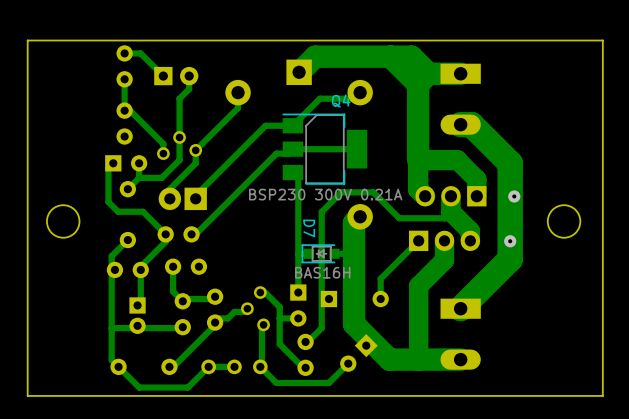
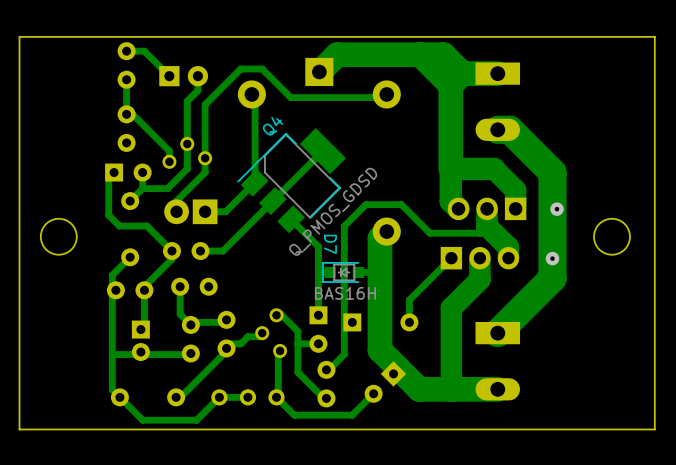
track: (238, 92) (238, 108) (195, 150) -> (251, 94) (255, 97) (255, 182) (225, 211) (205, 211)
track: none -> (386, 94) (383, 97) (290, 97) (262, 69) (240, 69) (205, 104) (205, 158)
track: (354, 98) (319, 98) (292, 125) (265, 125) (195, 195) (195, 198) -> none
Q4 rotation: 0° (324, 149) -> 45° counterclockwise (291, 180)
Q4 position: (324, 149) -> (291, 180)
track: (357, 149) (292, 149) (288, 153) (276, 153) (195, 234) -> (322, 151) (222, 251) (205, 251)
track: (298, 172) (298, 230) -> (291, 219) (318, 246)
Q4 value: BSP230 300V 0.21A (325, 194) -> Q_PMOS_GDSD (333, 211)

